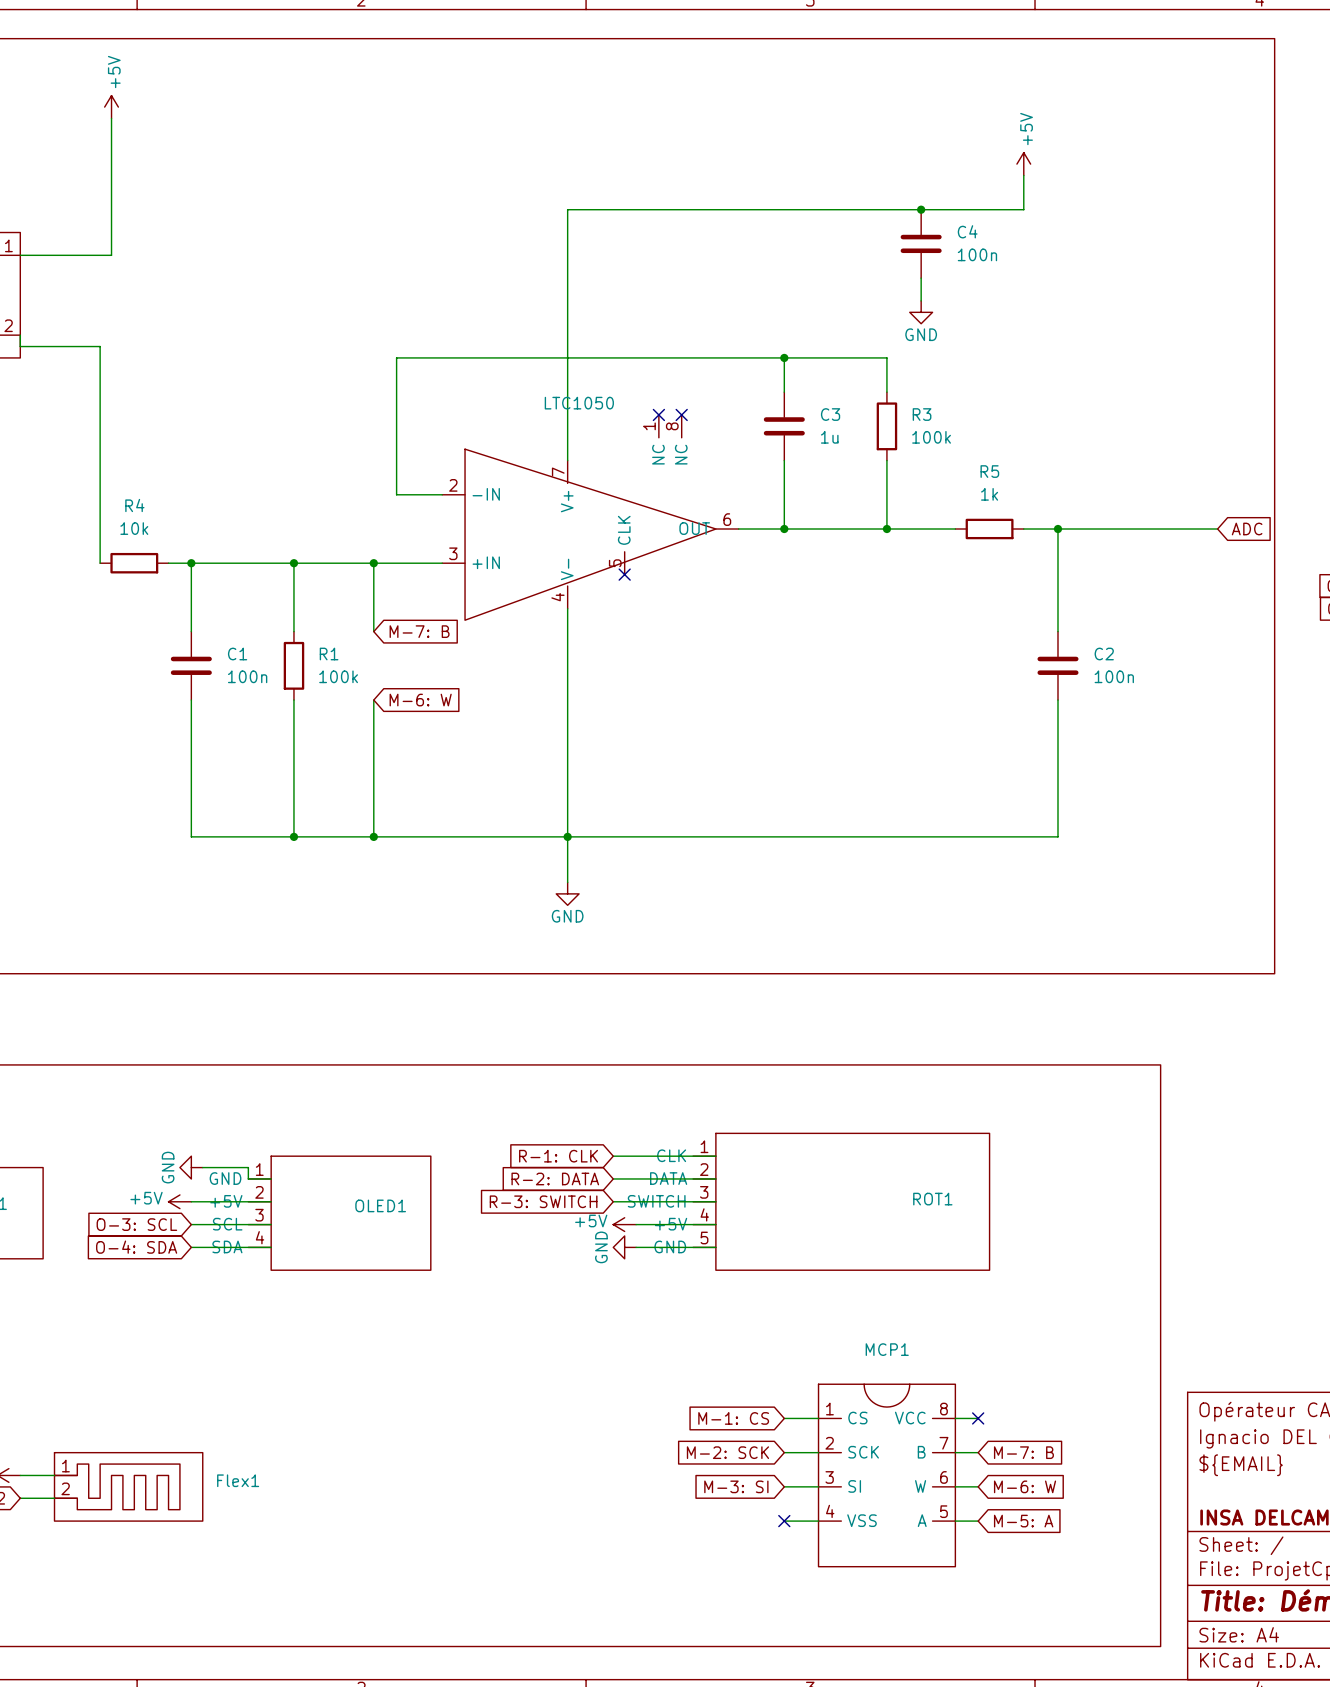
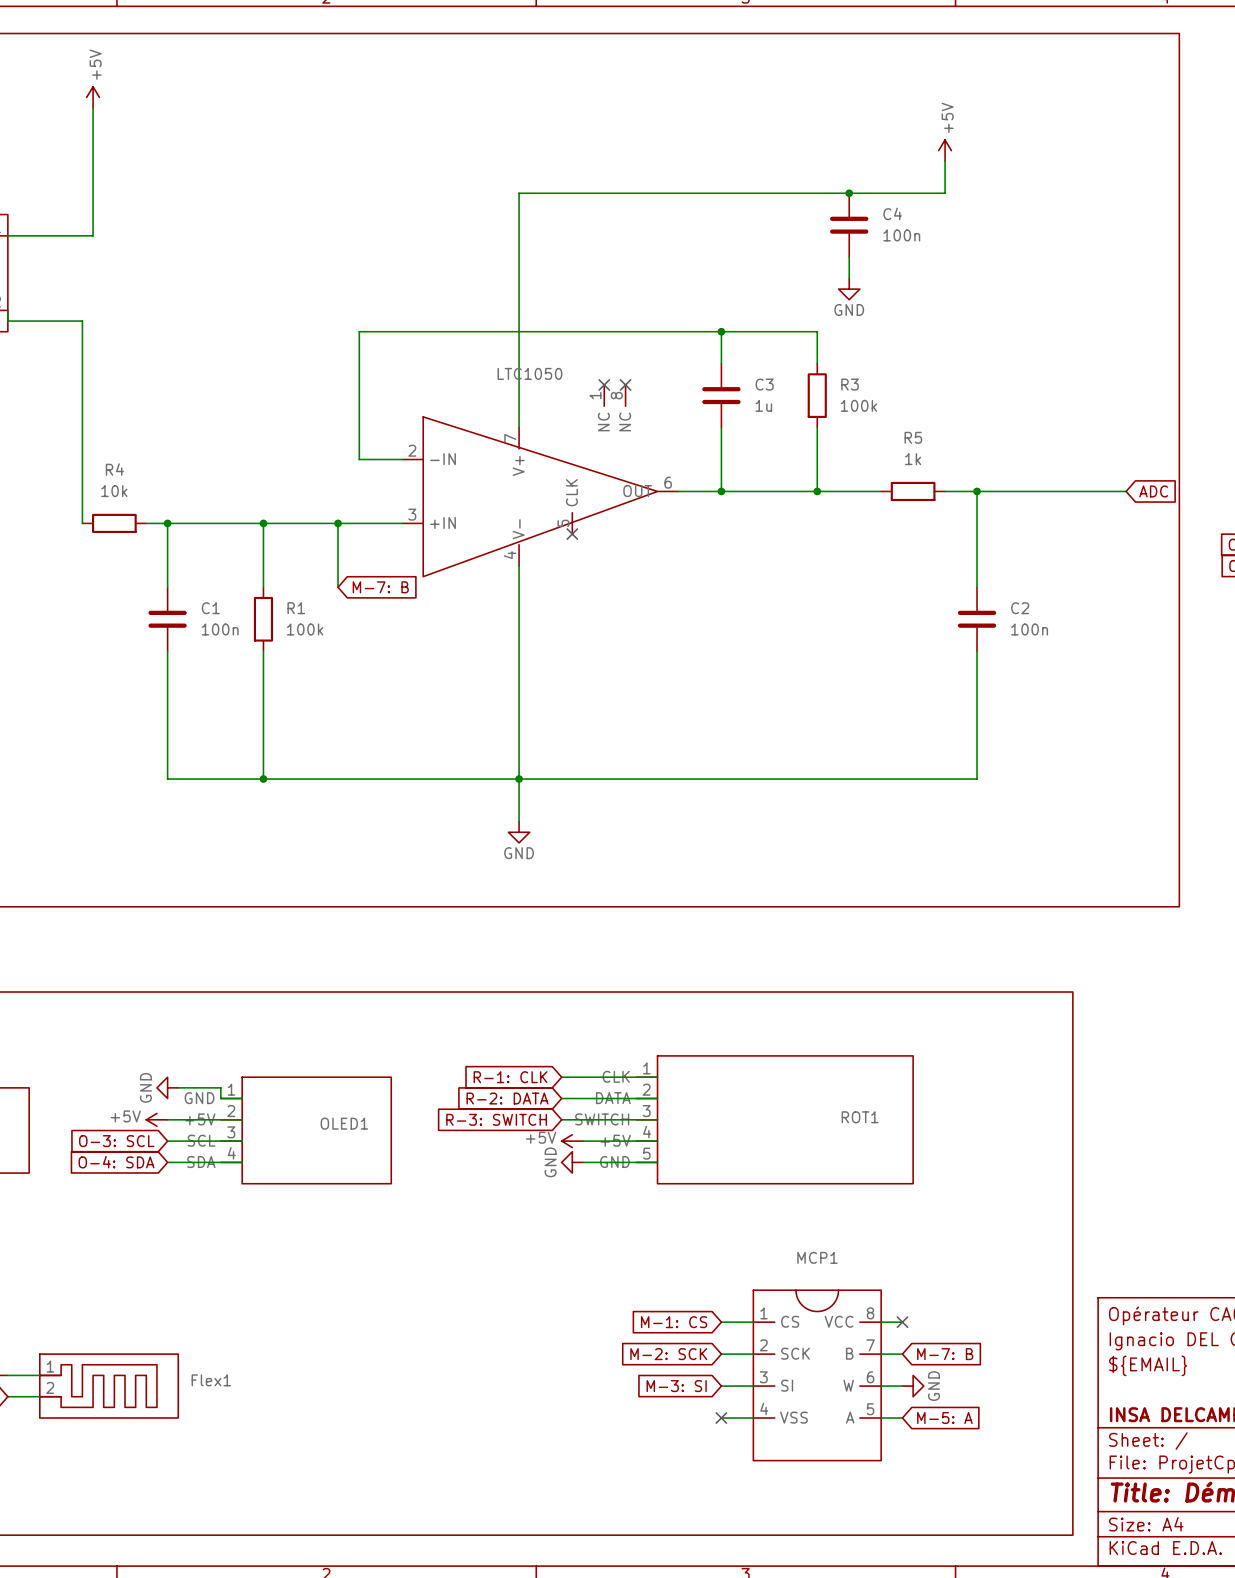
wire: (373, 700) (373, 836) -> none
global label: M-6: W (420, 700) -> none
junction: (373, 836) -> none
power symbol: none -> GND (913, 1386)
global label: M-6: W (1025, 1486) -> none

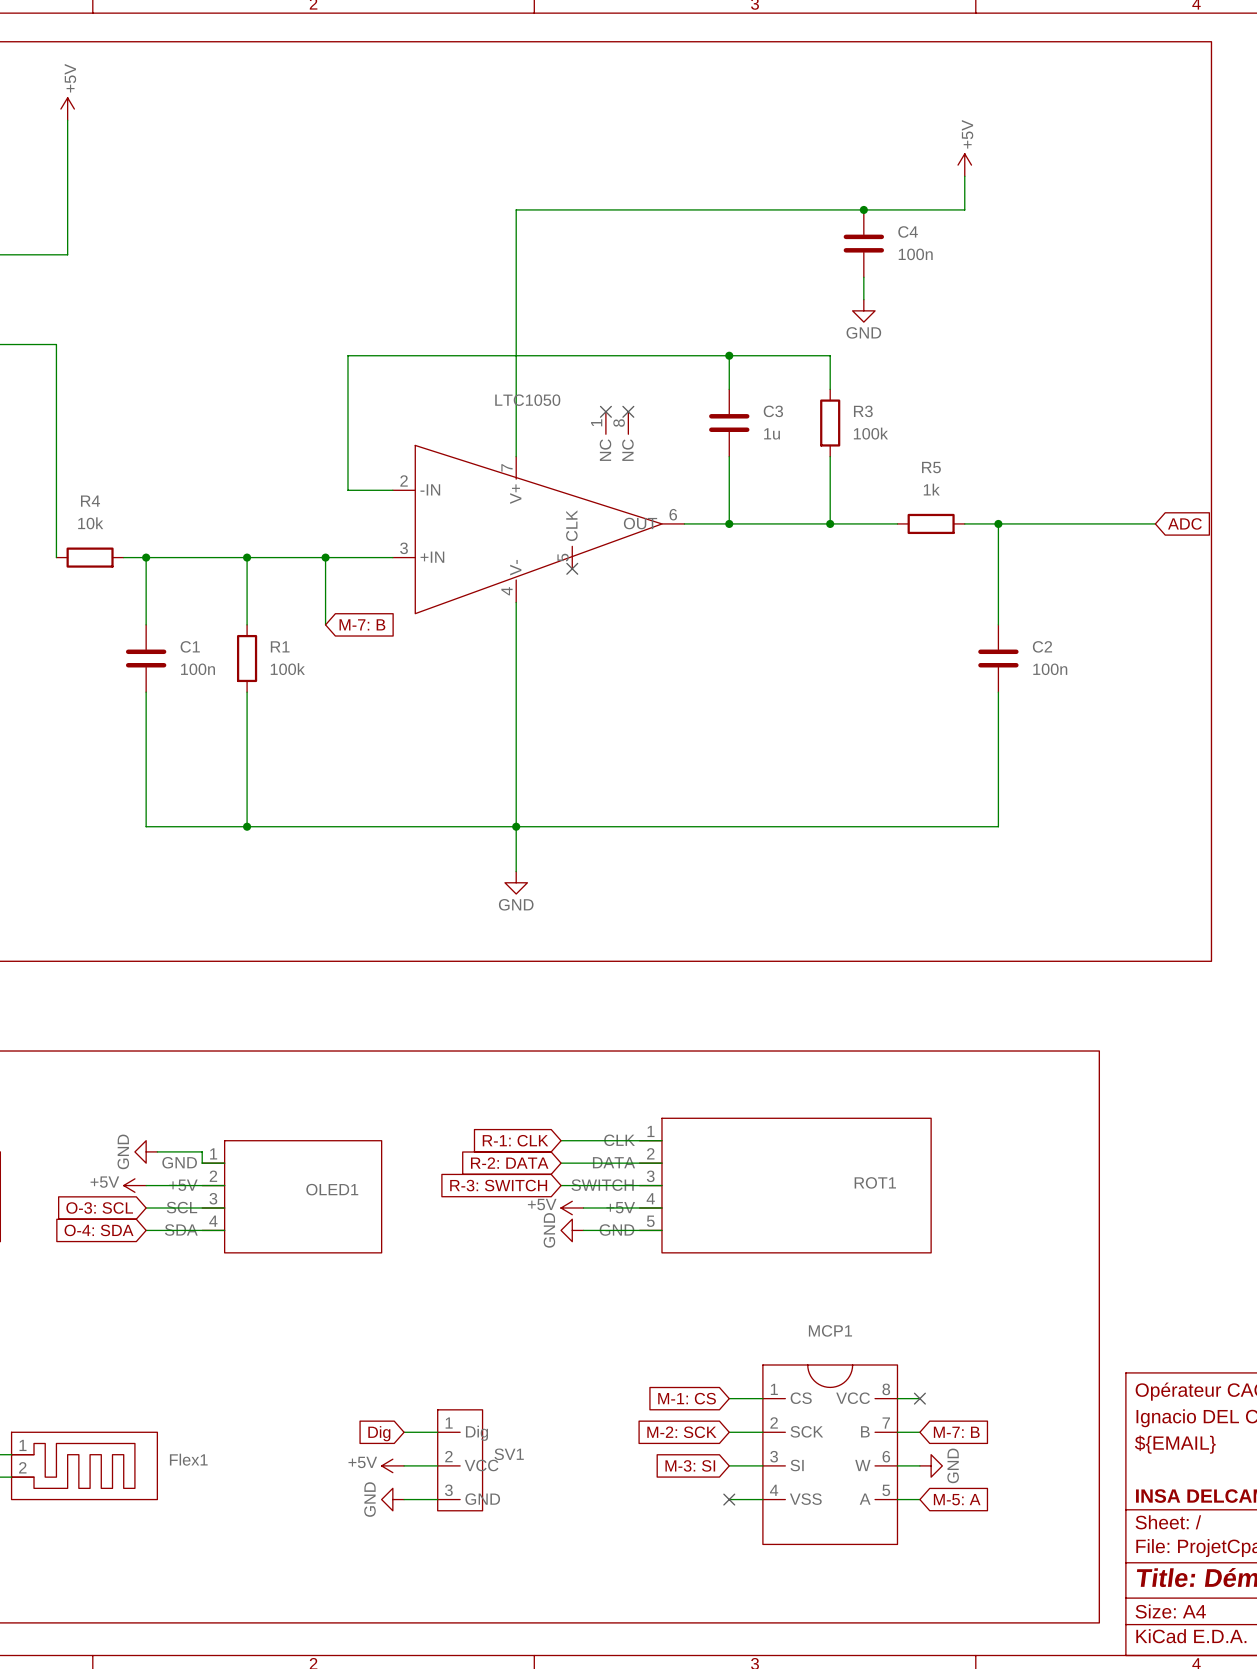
wire: none -> (404, 1432) (437, 1432)
global label: none -> Dig (379, 1433)
SV1: none -> (460, 1460)
power symbol: none -> +5V (392, 1465)
wire: none -> (404, 1465) (437, 1465)
power symbol: none -> GND (392, 1499)
wire: none -> (404, 1499) (437, 1499)

